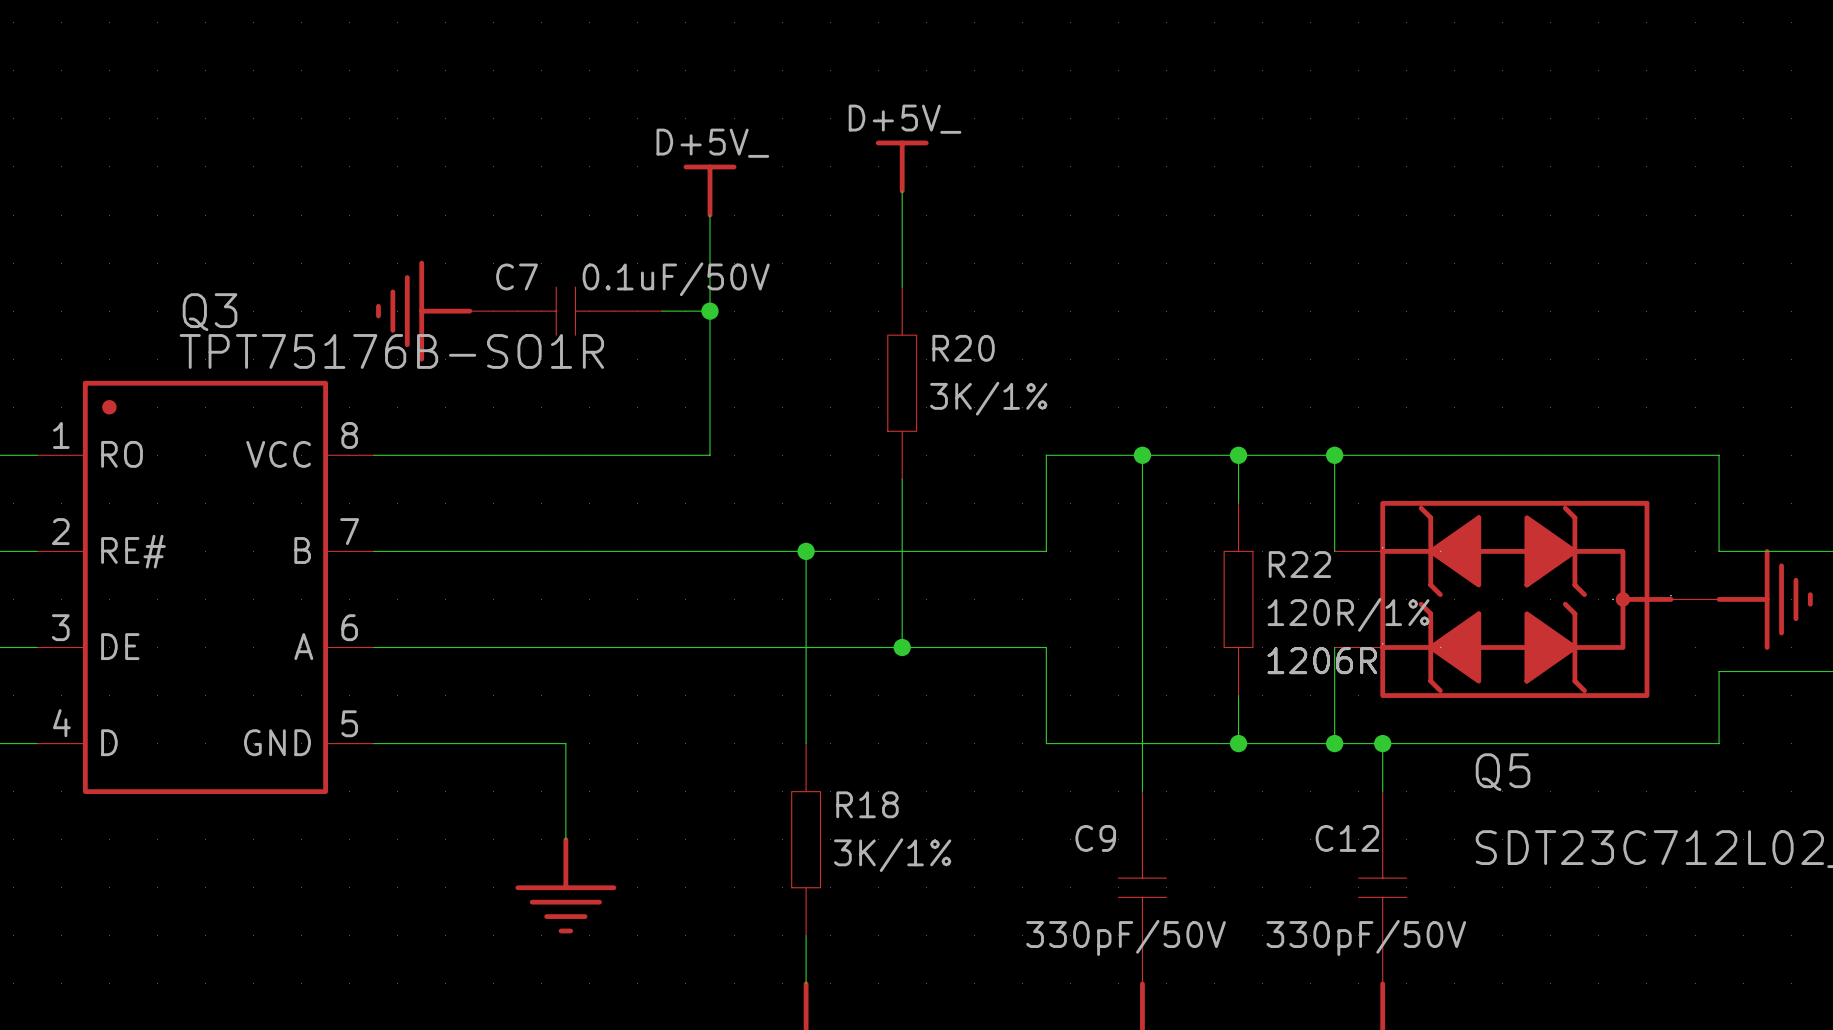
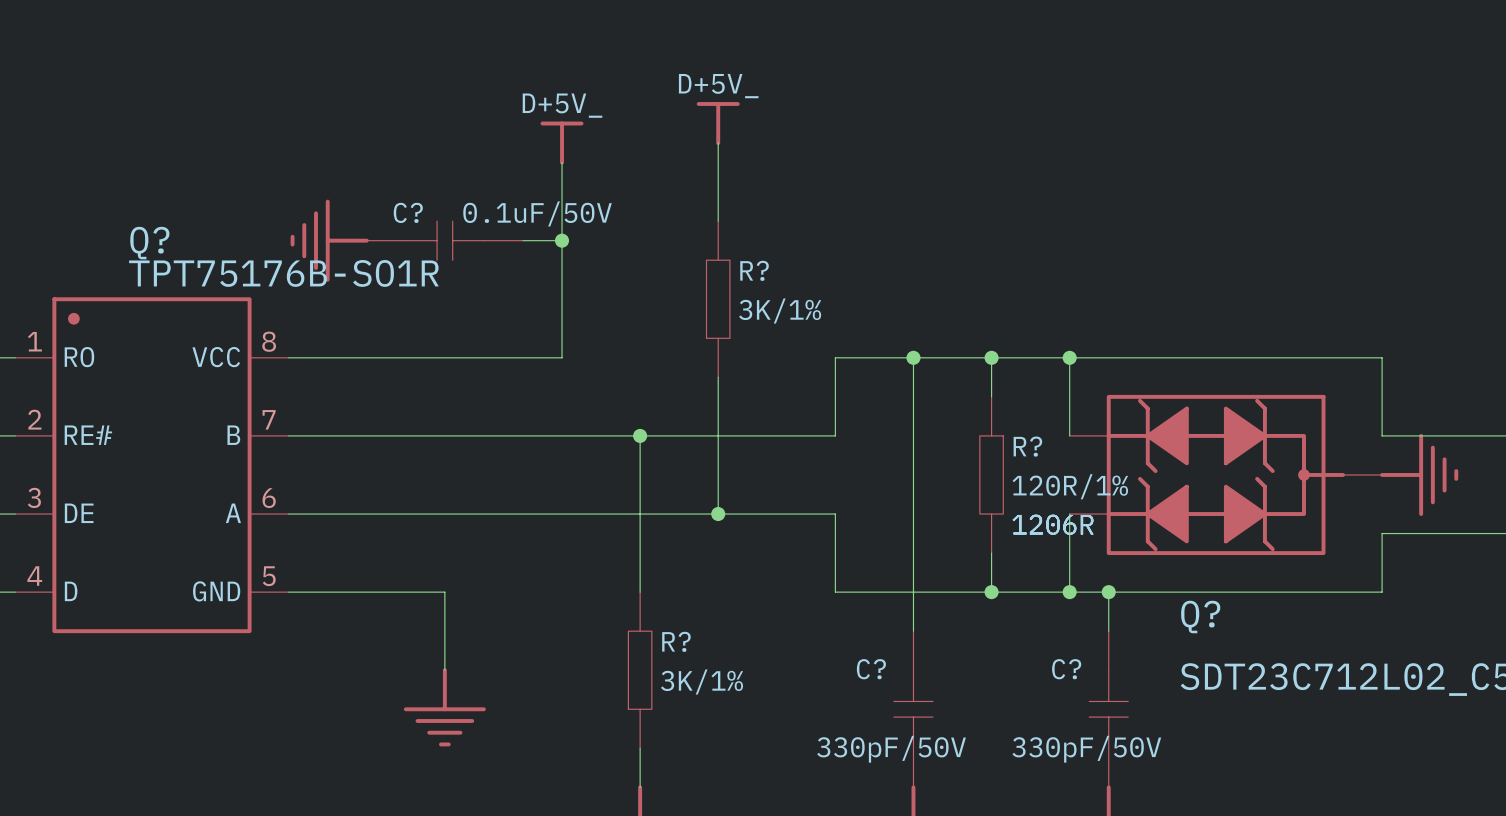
C7 name: C7 (517, 276) -> C? (408, 212)
Q3 name: Q3 (210, 312) -> Q? (149, 243)
R20 name: R20 (963, 348) -> R? (754, 270)
R22 name: R22 (1299, 564) -> R? (1027, 446)
Q5 name: Q5 (1503, 772) -> Q? (1200, 616)
R18 name: R18 (867, 804) -> R? (676, 641)
C9 name: C9 (1095, 838) -> C? (871, 669)
C12 name: C12 (1347, 838) -> C? (1066, 669)

